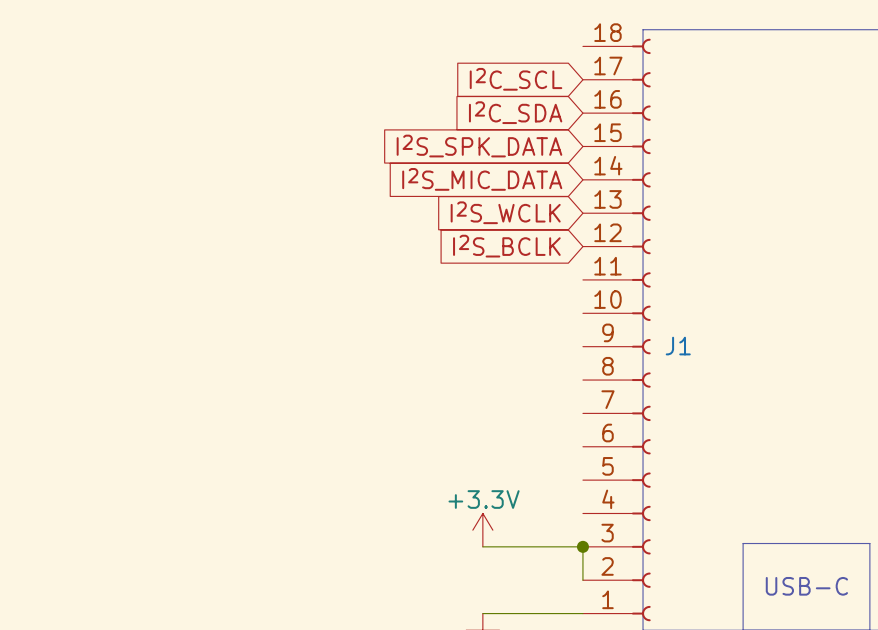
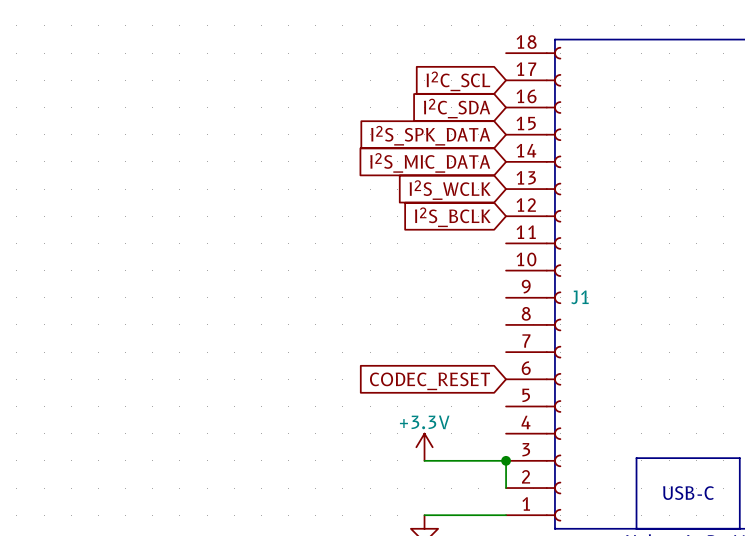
global label: none -> CODEC_RESET (429, 381)

